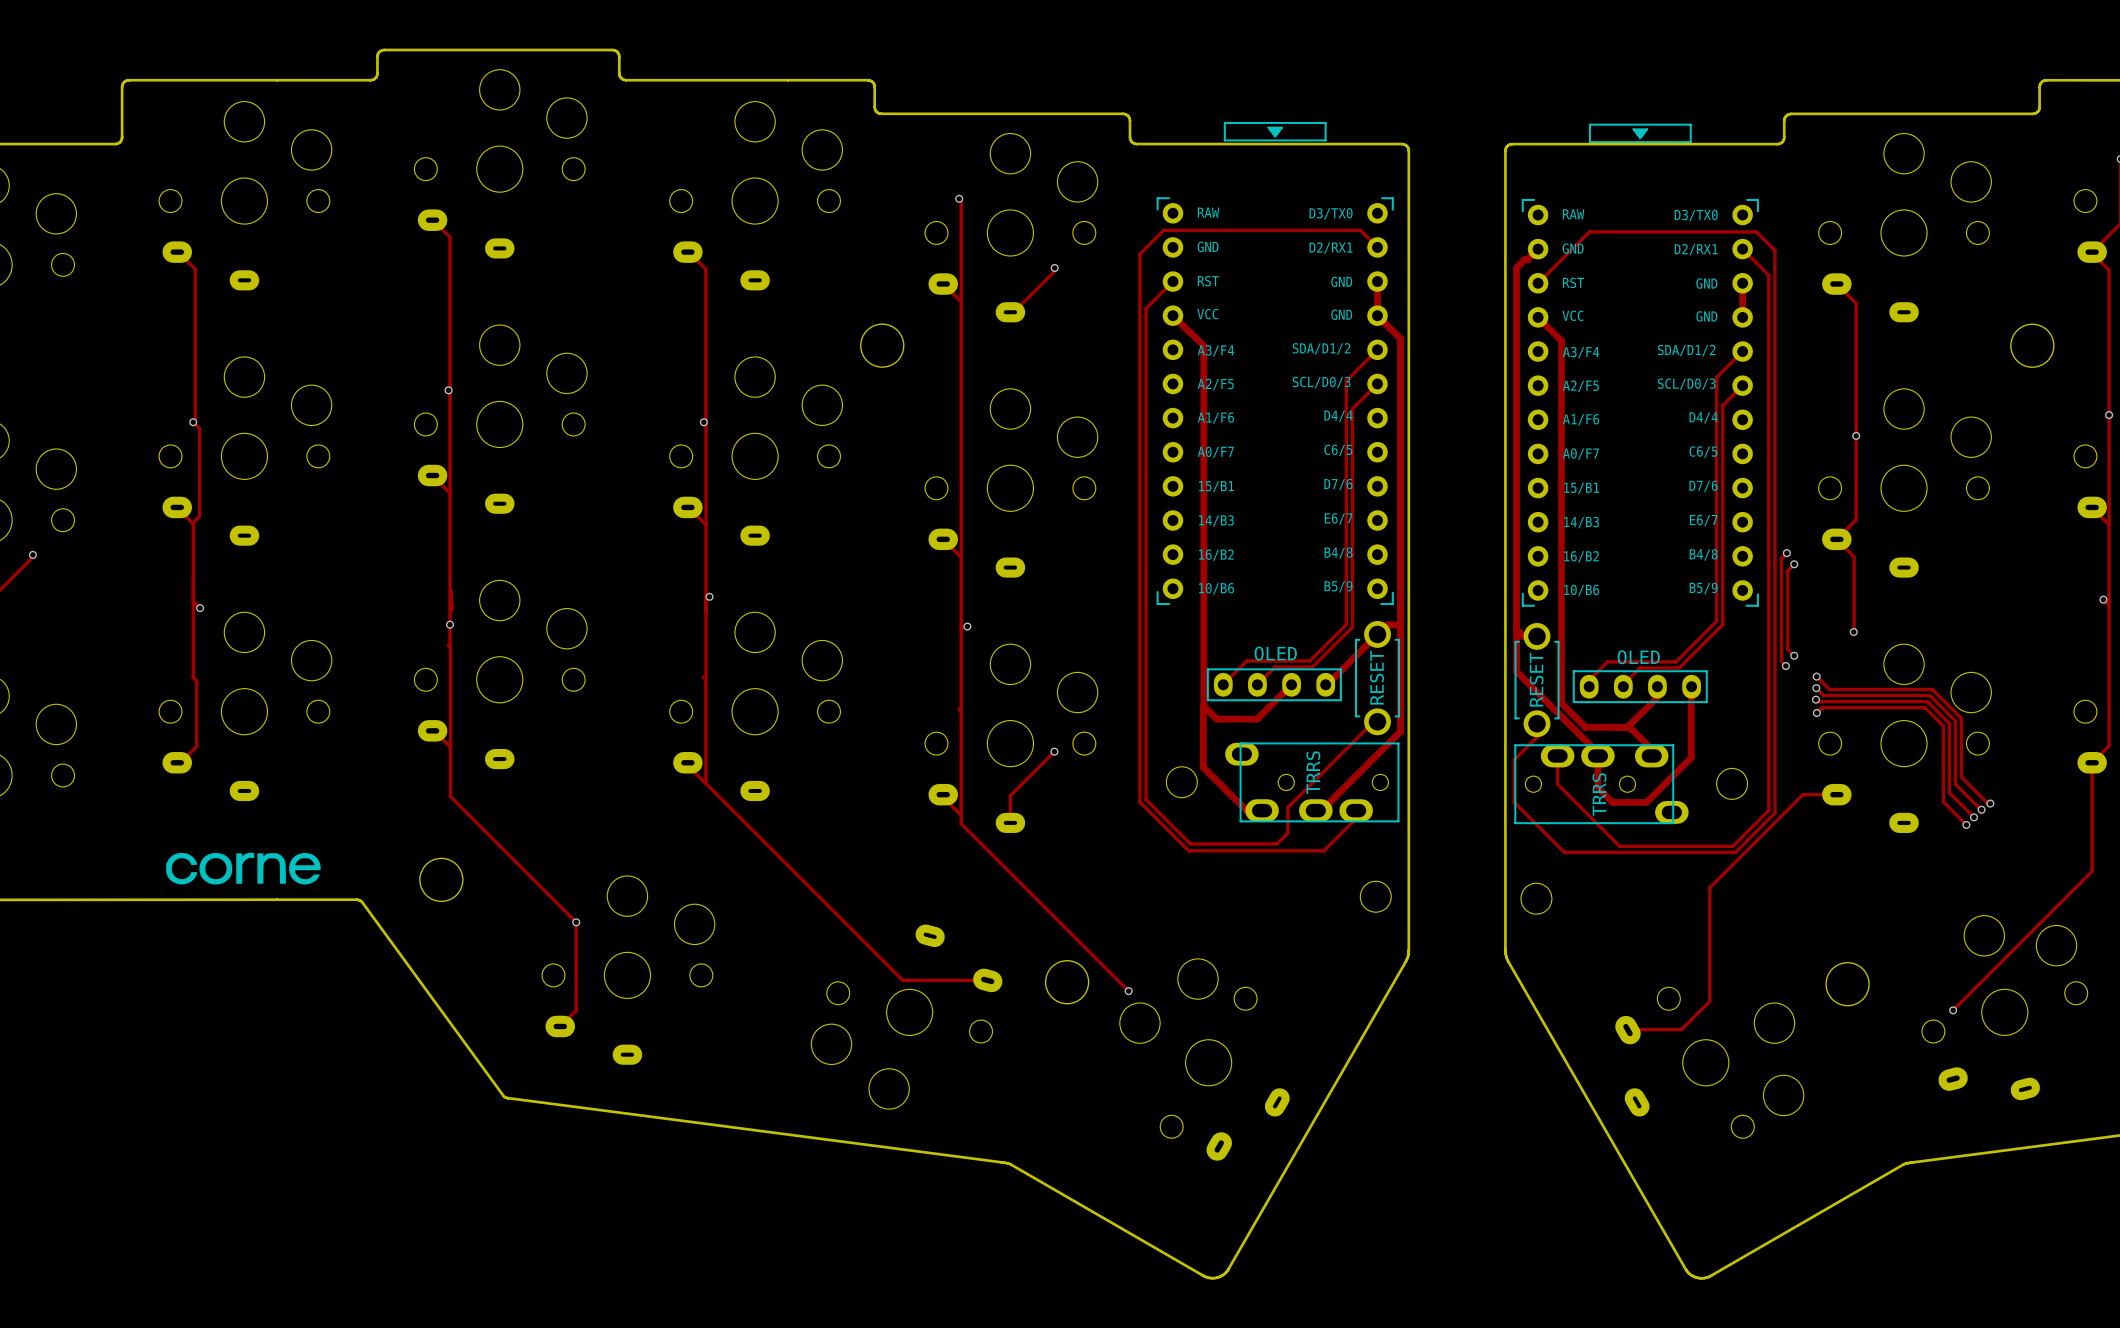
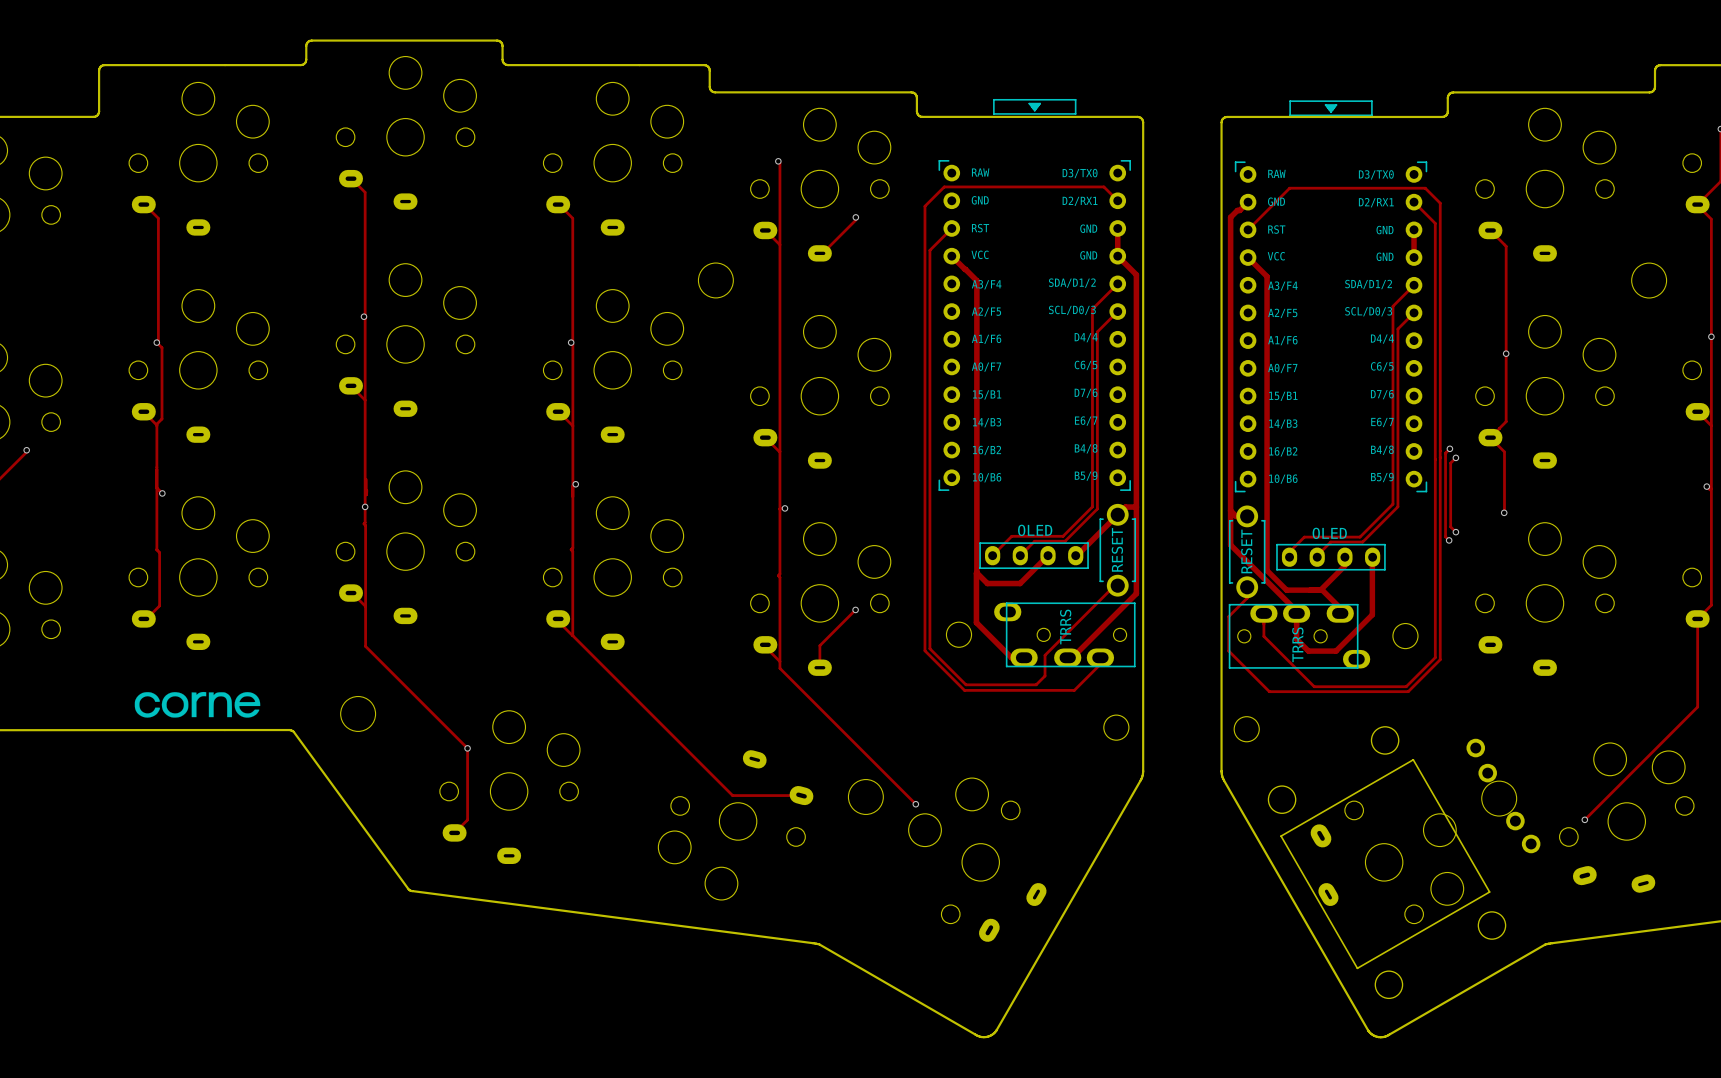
track: (1816, 676) (1829, 689) (1932, 689) (1961, 718) (1961, 777) (1987, 803) (1990, 803) -> none
via: (1816, 676) -> none
track: (1816, 688) (1823, 695) (1930, 695) (1955, 720) (1955, 784) (1981, 809) -> none
via: (1816, 688) -> none
track: (1815, 699) (1817, 701) (1927, 701) (1949, 723) (1949, 792) (1973, 817) -> none
via: (1815, 699) -> none
track: (1816, 712) (1822, 707) (1925, 707) (1943, 725) (1943, 801) (1966, 824) -> none
via: (1816, 712) -> none
track: (1836, 794) (1802, 794) (1709, 887) (1709, 1001) (1681, 1029) (1626, 1029) -> none
via: (1990, 803) -> none
via: (1981, 809) -> none
via: (1973, 817) -> none
via: (1966, 824) -> none
part: none -> (1404, 862)

